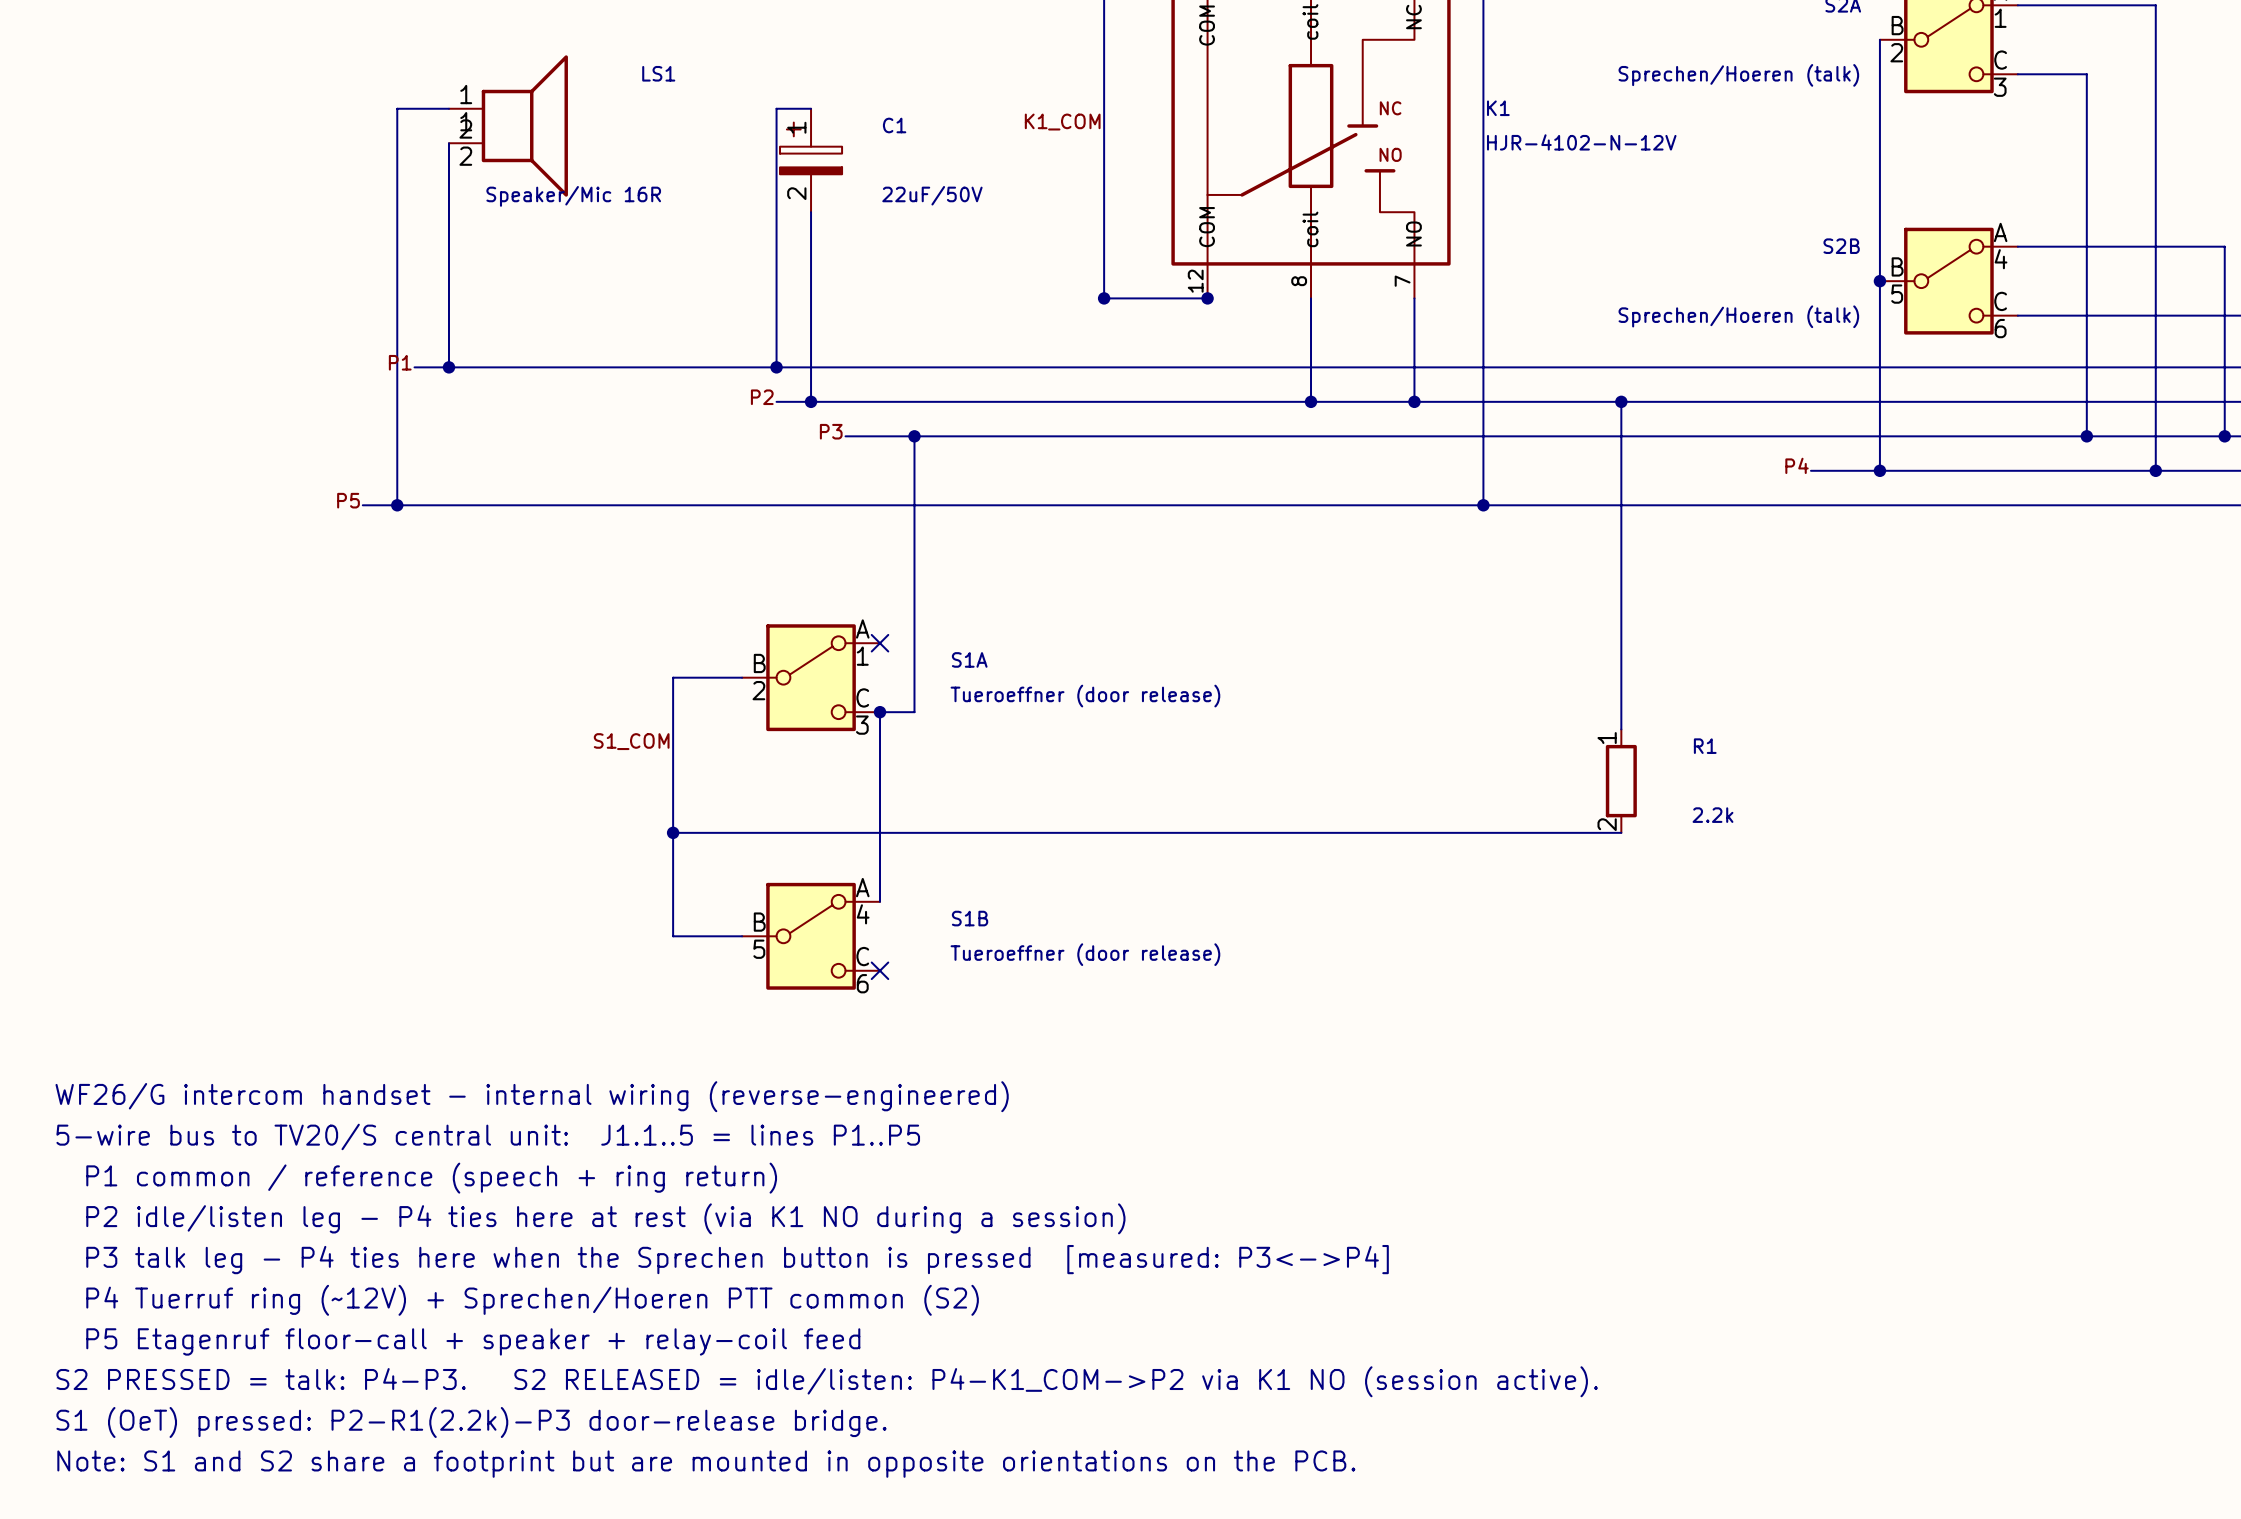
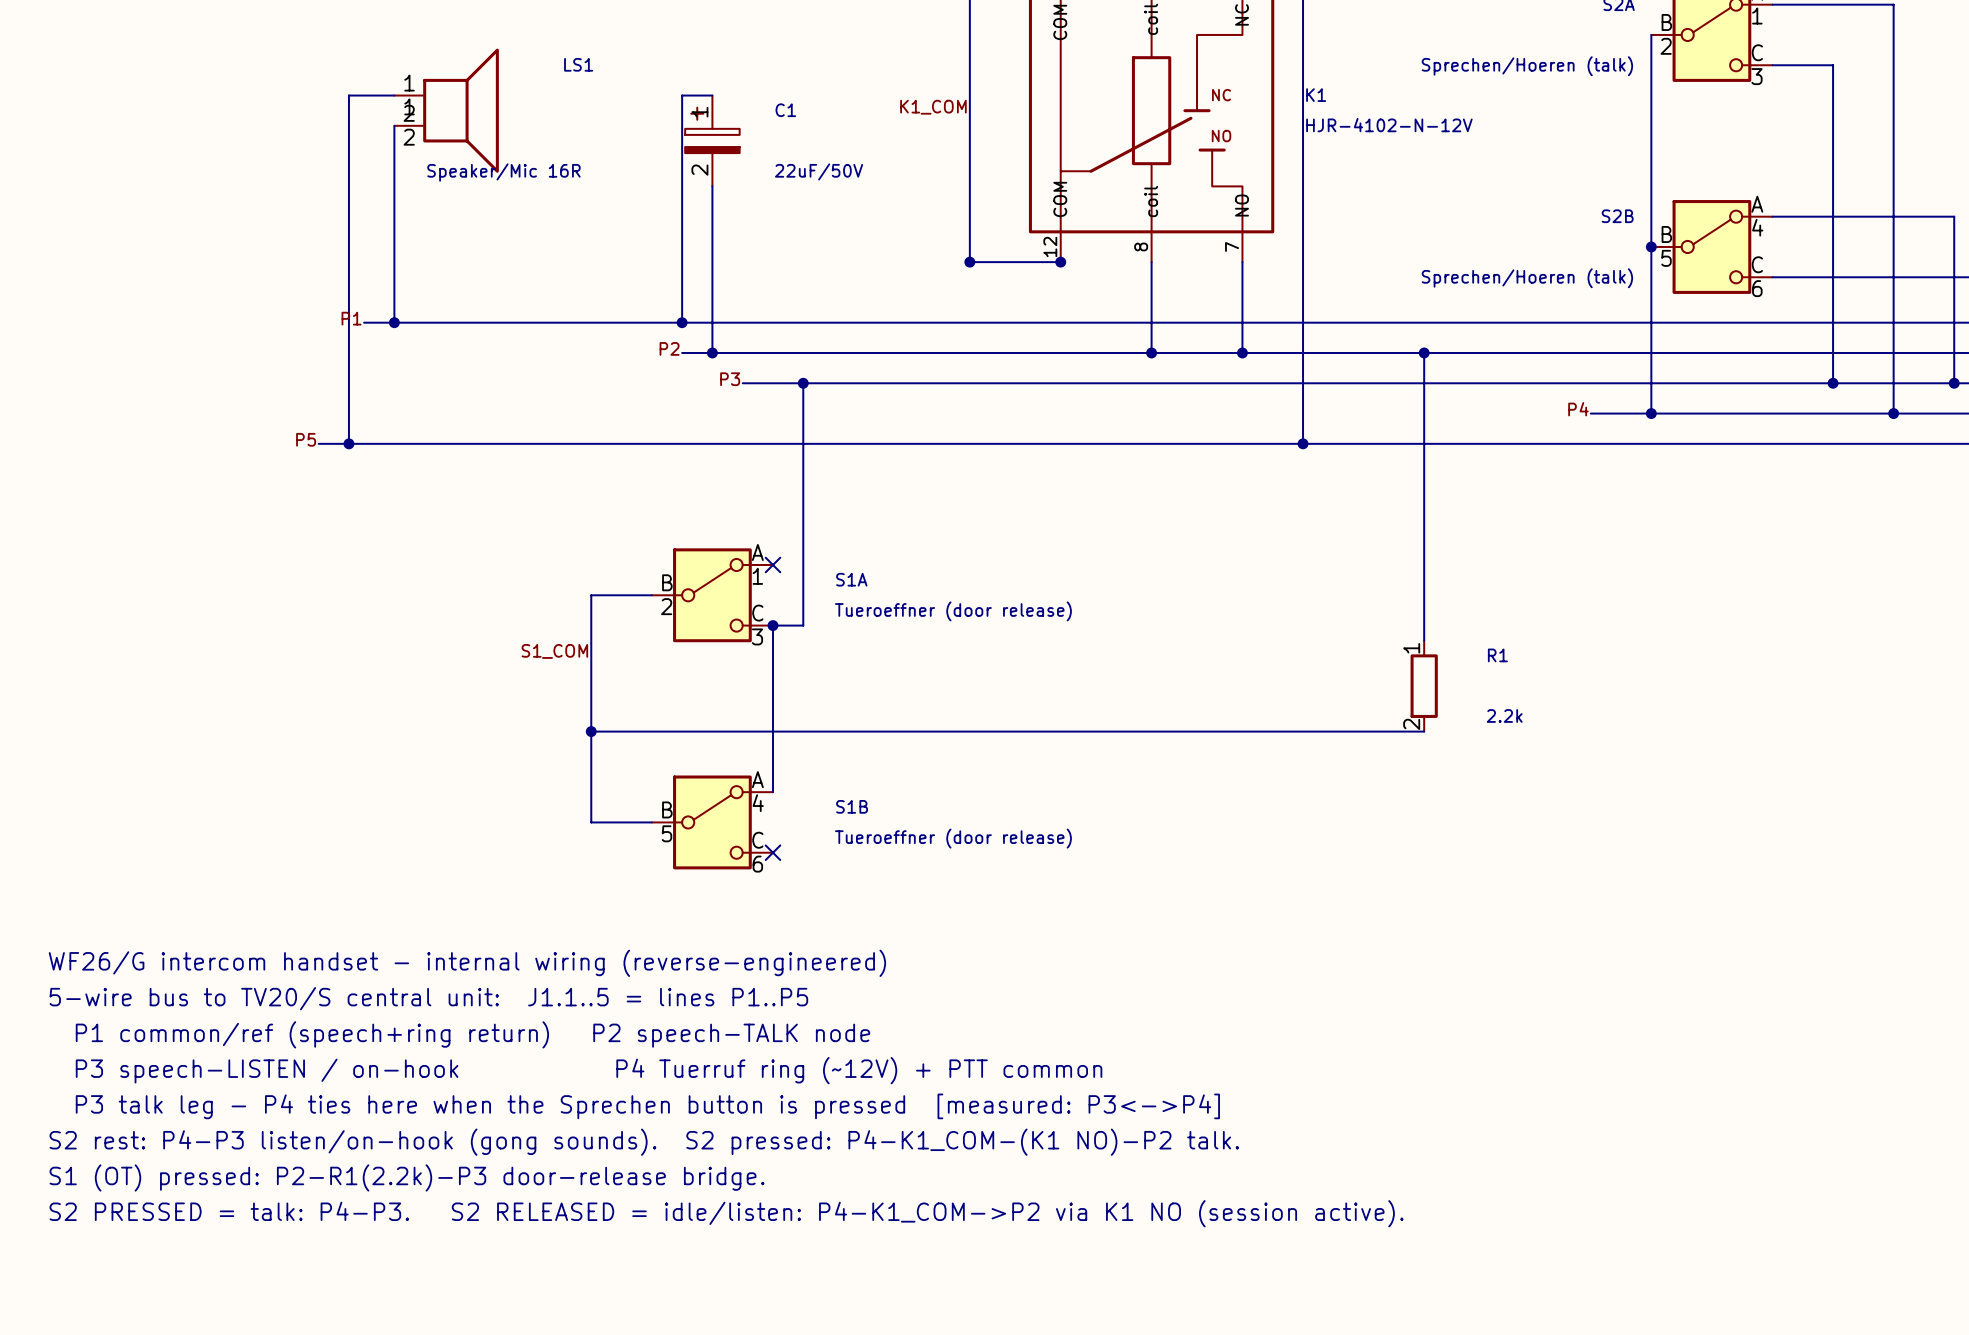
text: P1 common / reference (speech + ring return) (431, 1178) -> P1 common/ref (speech+ring return) P2 speech-TALK node (472, 1034)
text: P2 idle/listen leg - P4 ties here at rest (via K1 NO during a session) (605, 1218) -> P3 speech-LISTEN / on-hook P4 Tuerruf ring (~12V) + PTT common (589, 1070)
text: P4 Tuerruf ring (~12V) + Sprechen/Hoeren PTT common (S2) (532, 1300) -> S2 rest: P4-P3 listen/on-hook (gong sounds). S2 pressed: P4-K1_COM-(K1 NO)-P2 talk. (644, 1142)
text: P5 Etagenruf floor-call + speaker + relay-coil feed (473, 1341) -> S1 (OT) pressed: P2-R1(2.2k)-P3 door-release bridge. (406, 1177)
text: S1 (OeT) pressed: P2-R1(2.2k)-P3 door-release bridge. (471, 1422) -> none
text: Note: S1 and S2 share a footprint but are mounted in opposite orientations on the PCB. (706, 1464) -> none

